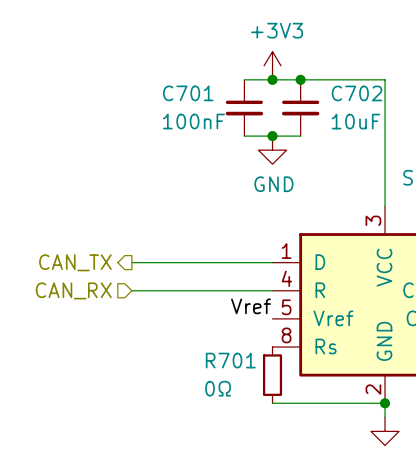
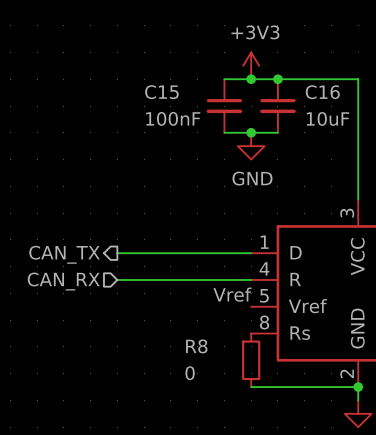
C701 name: C701 (188, 93) -> C15 (161, 92)
C702 name: C702 (357, 93) -> C16 (322, 92)
R701 name: R701 (230, 360) -> R8 (196, 346)
R701 value: 0Ω (218, 388) -> 0 (190, 373)

